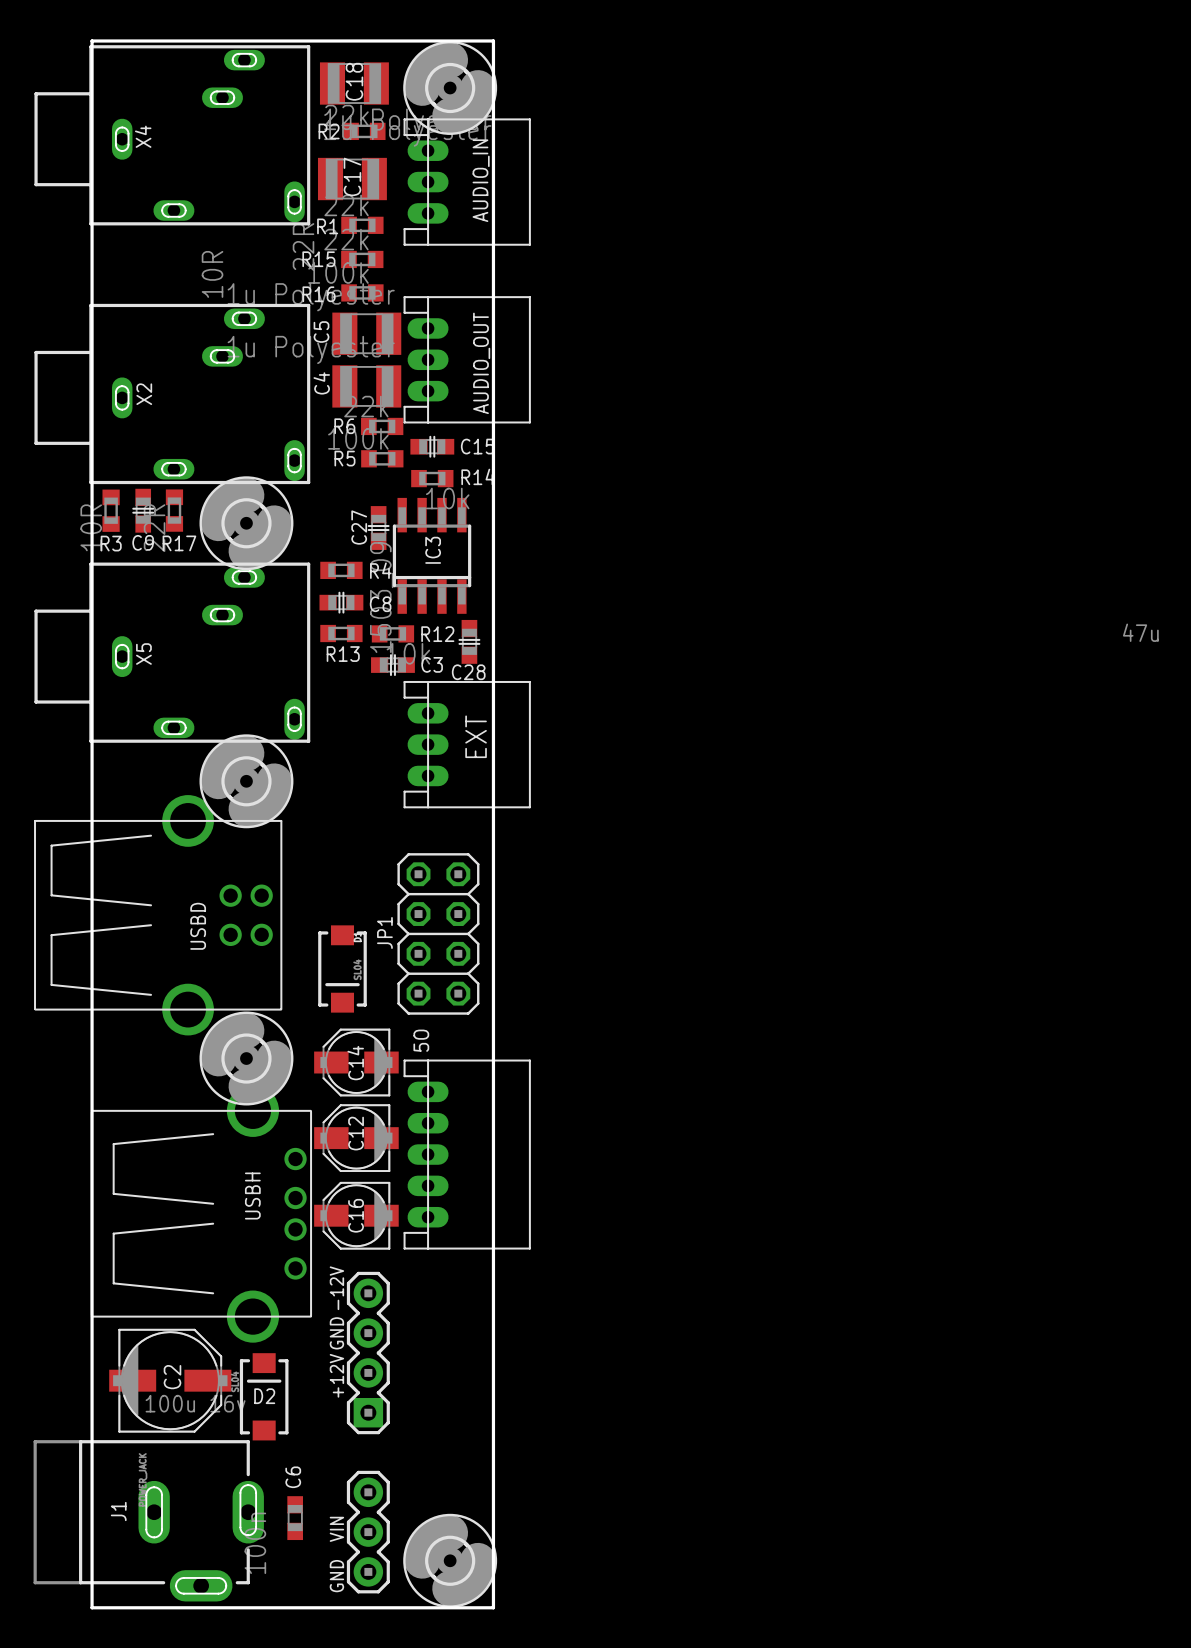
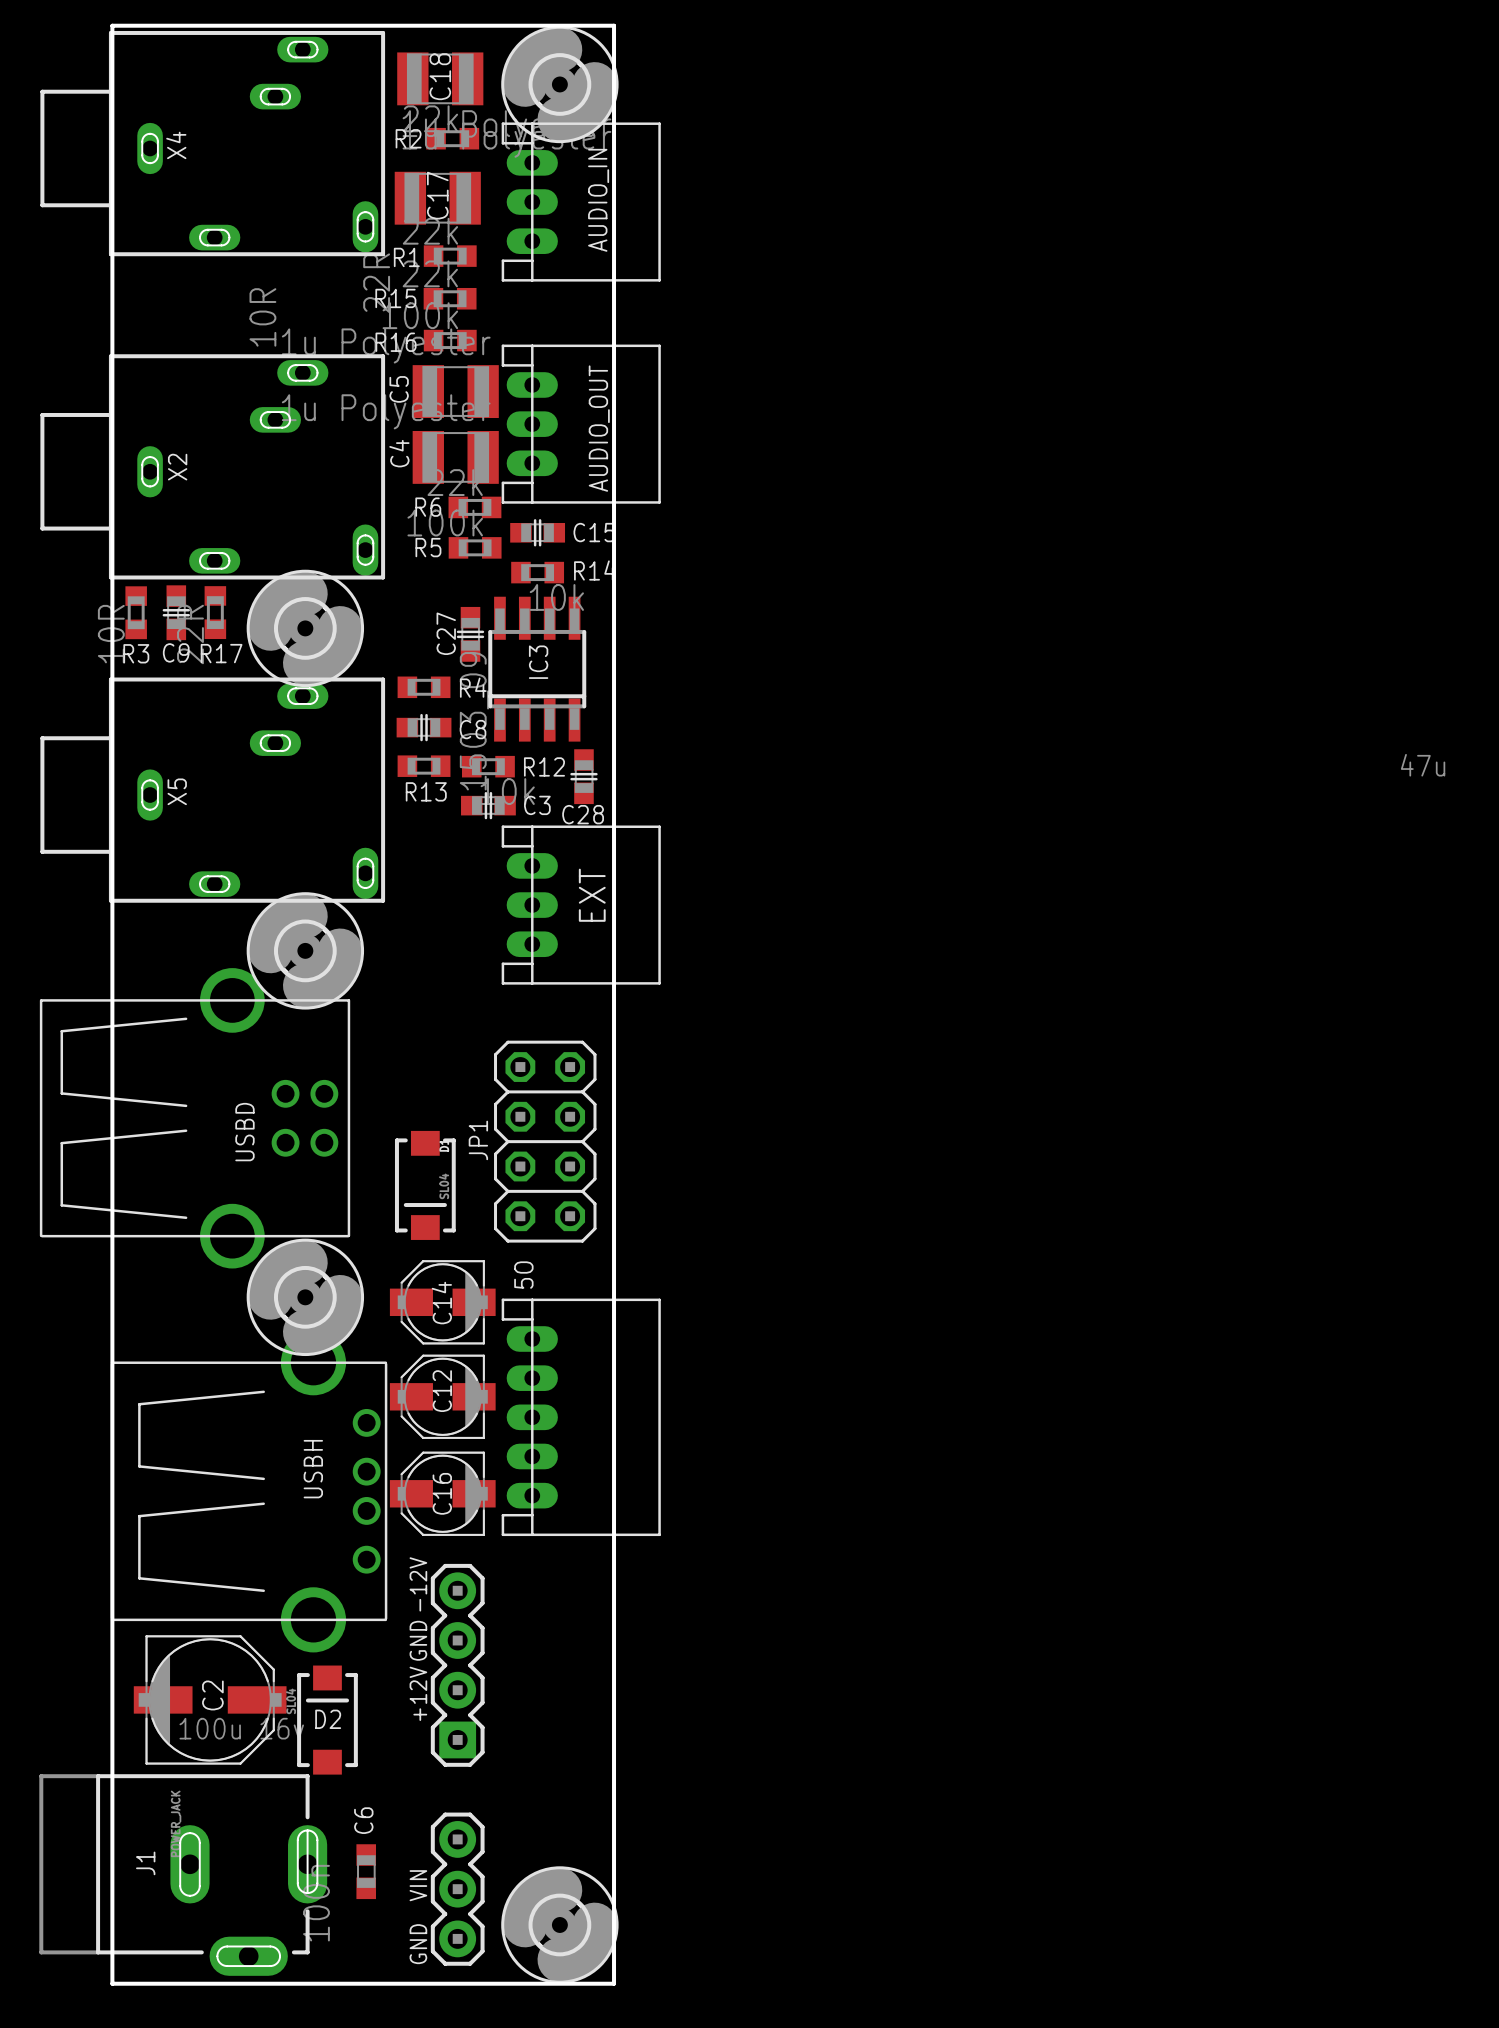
J1 footprint: [33, 1440, 264, 1602] -> [39, 1774, 328, 1976]

